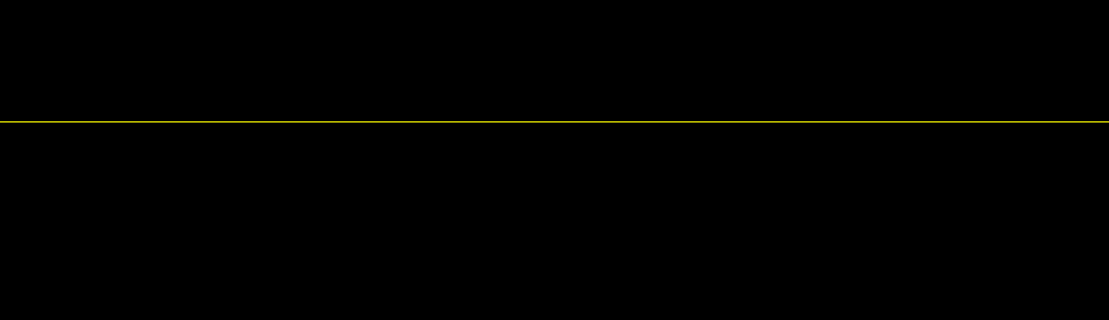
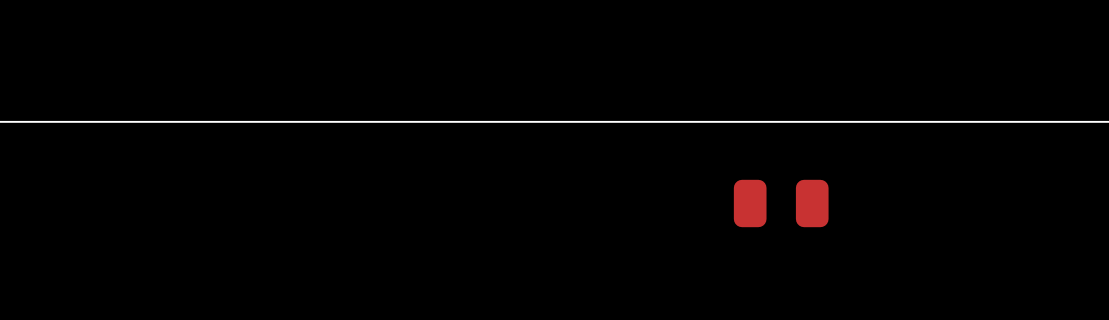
part: none -> (781, 203)

